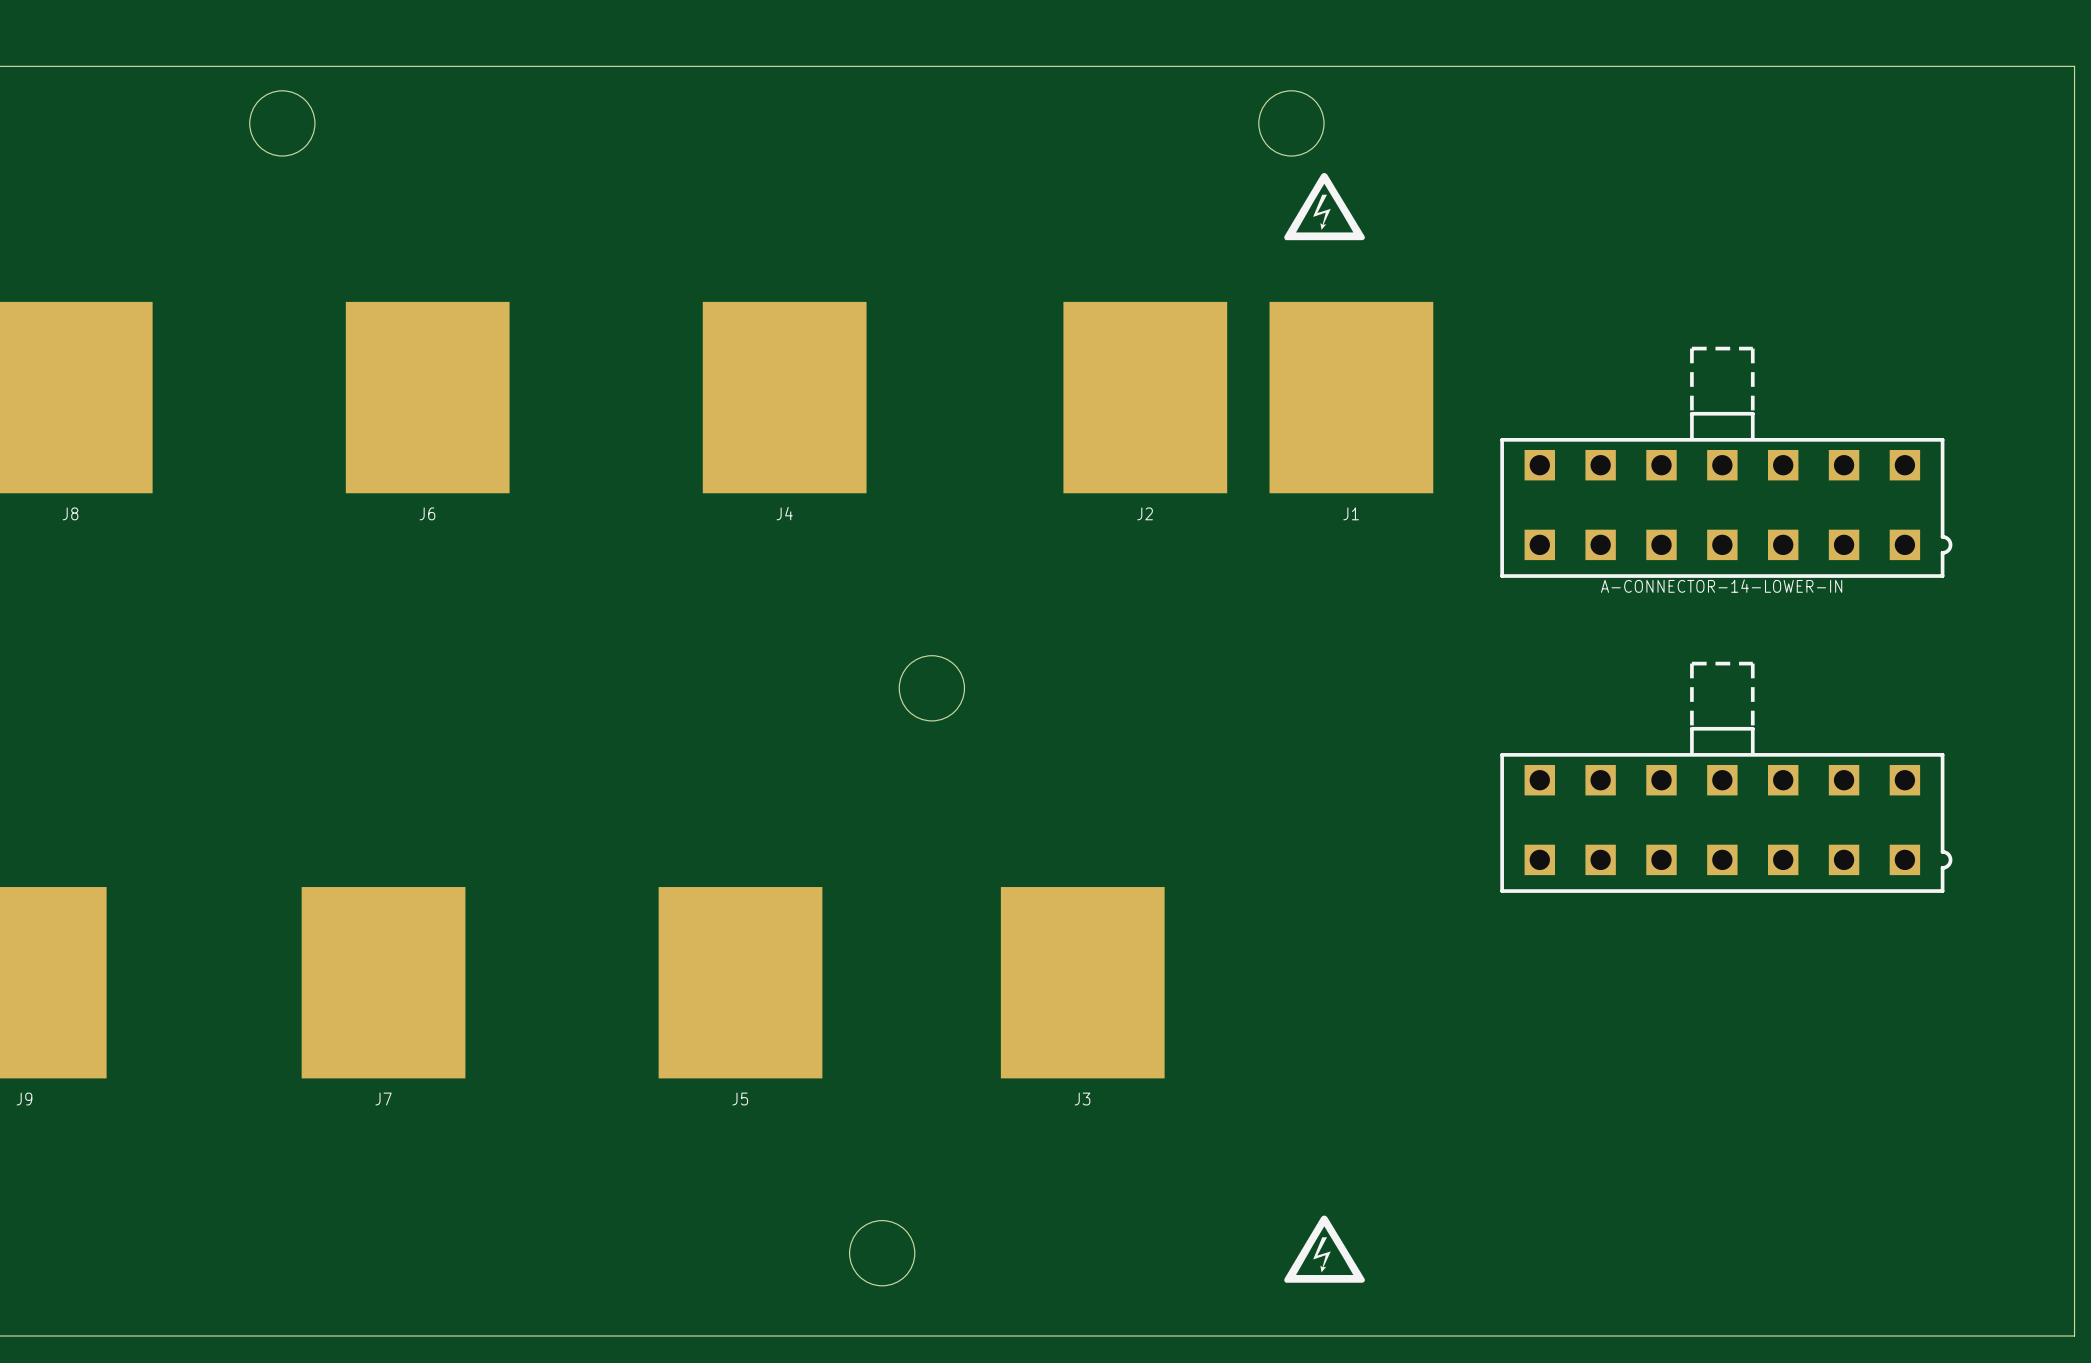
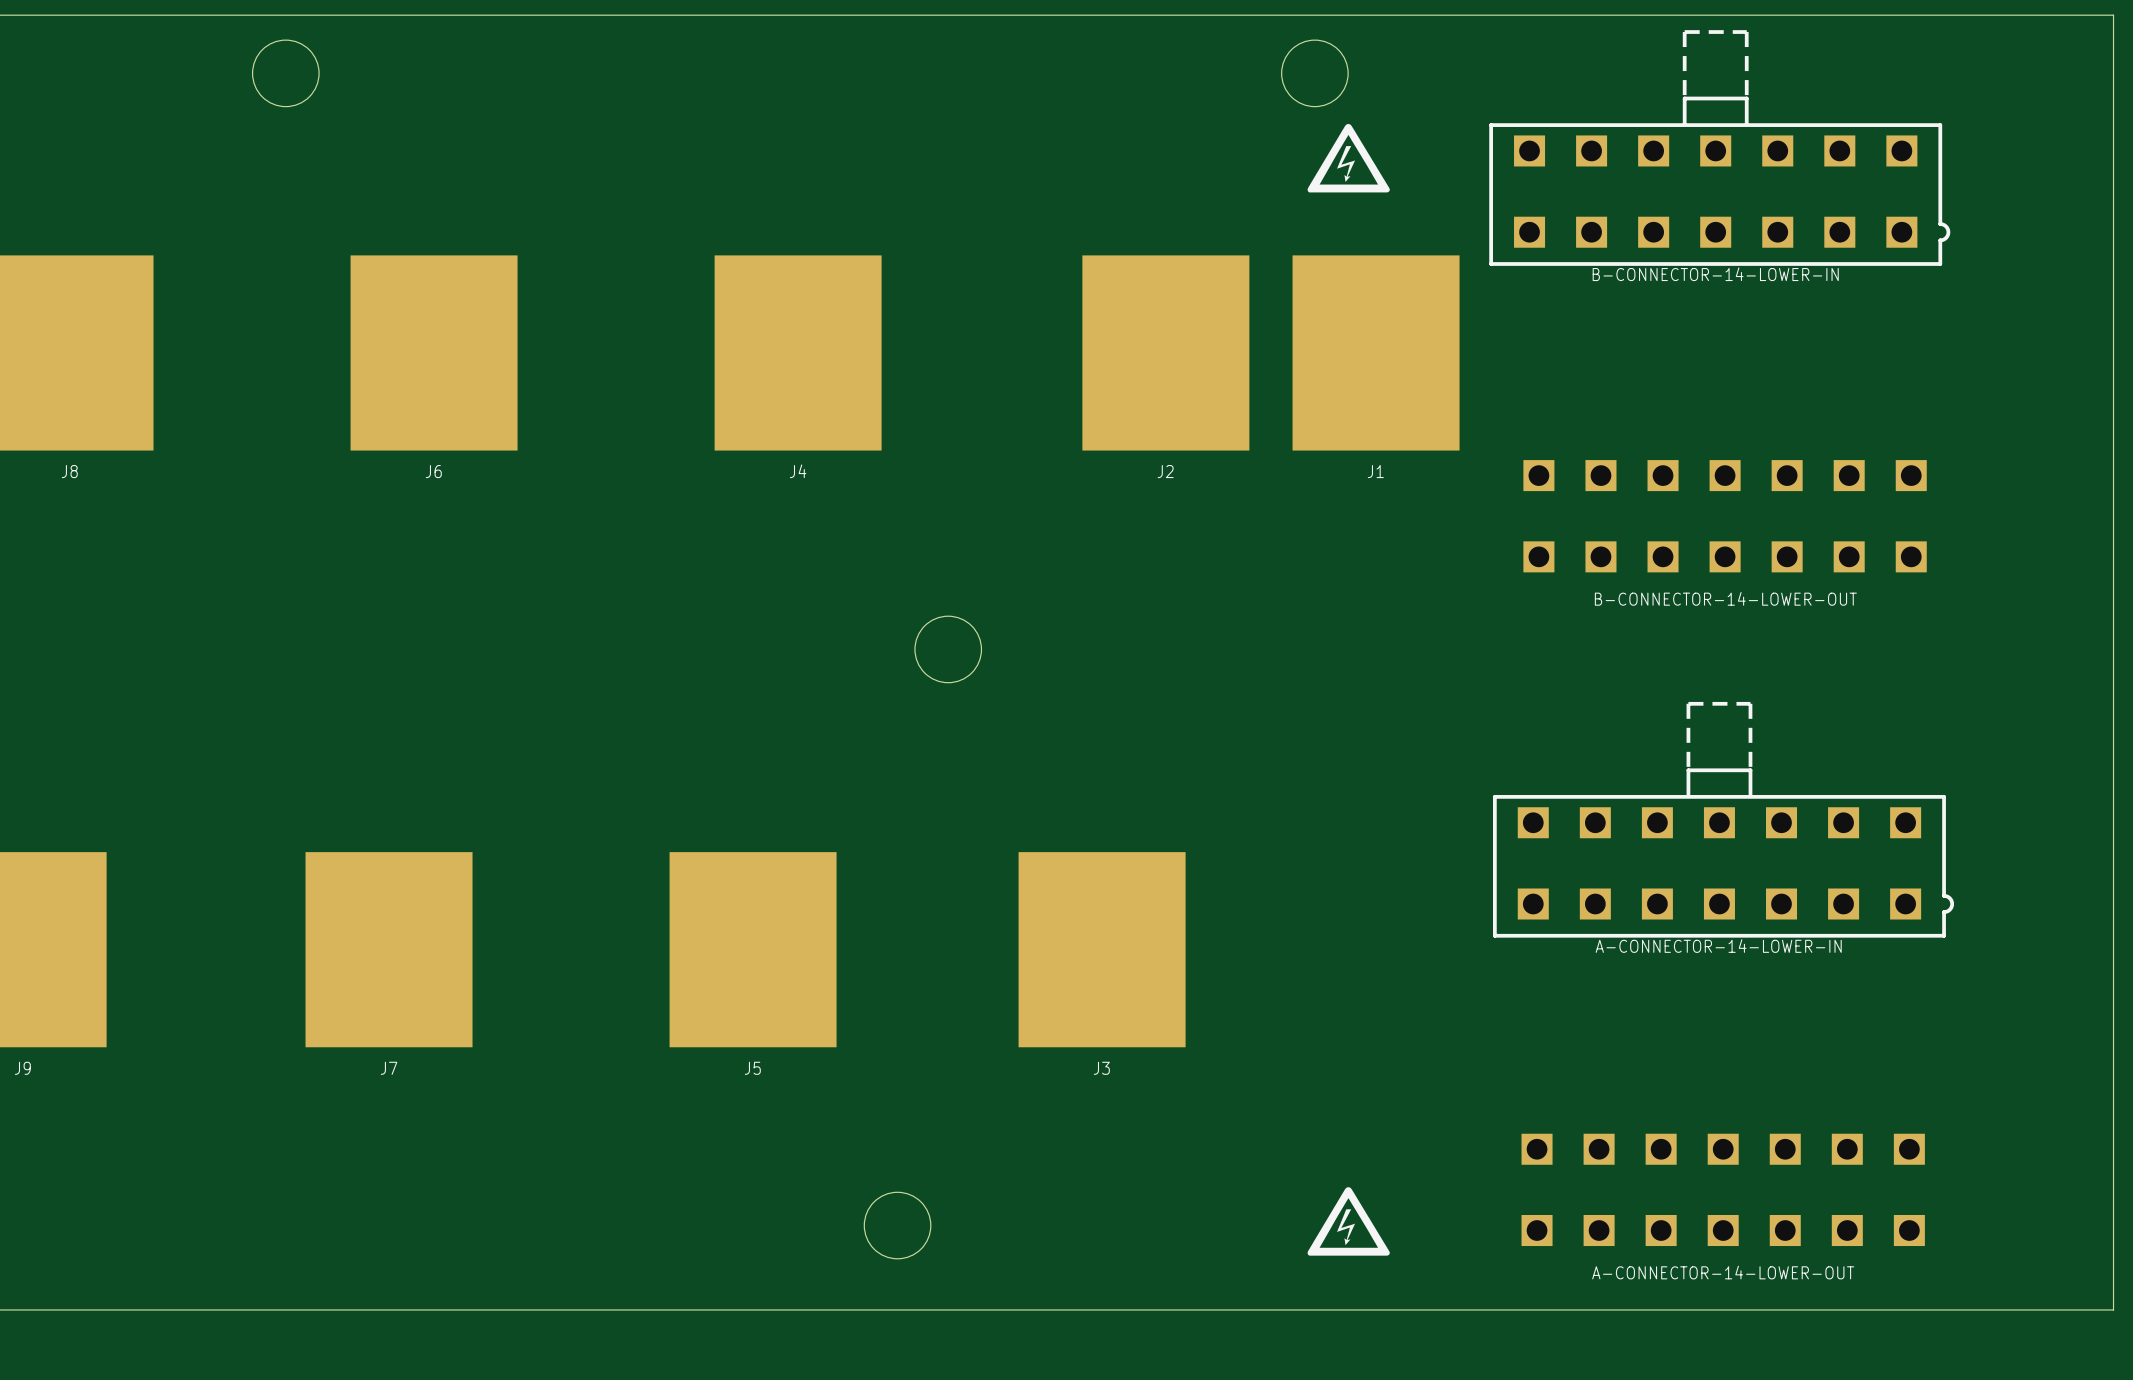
B-CONNECTOR-14-LOWER-IN: none -> (1719, 148)
A-CONNECTOR-14-LOWER-IN position: (1726, 462) -> (1723, 819)
B-CONNECTOR-14-LOWER-OUT: none -> (1725, 516)
part: (1726, 777) -> none
A-CONNECTOR-14-LOWER-OUT: none -> (1723, 1189)

